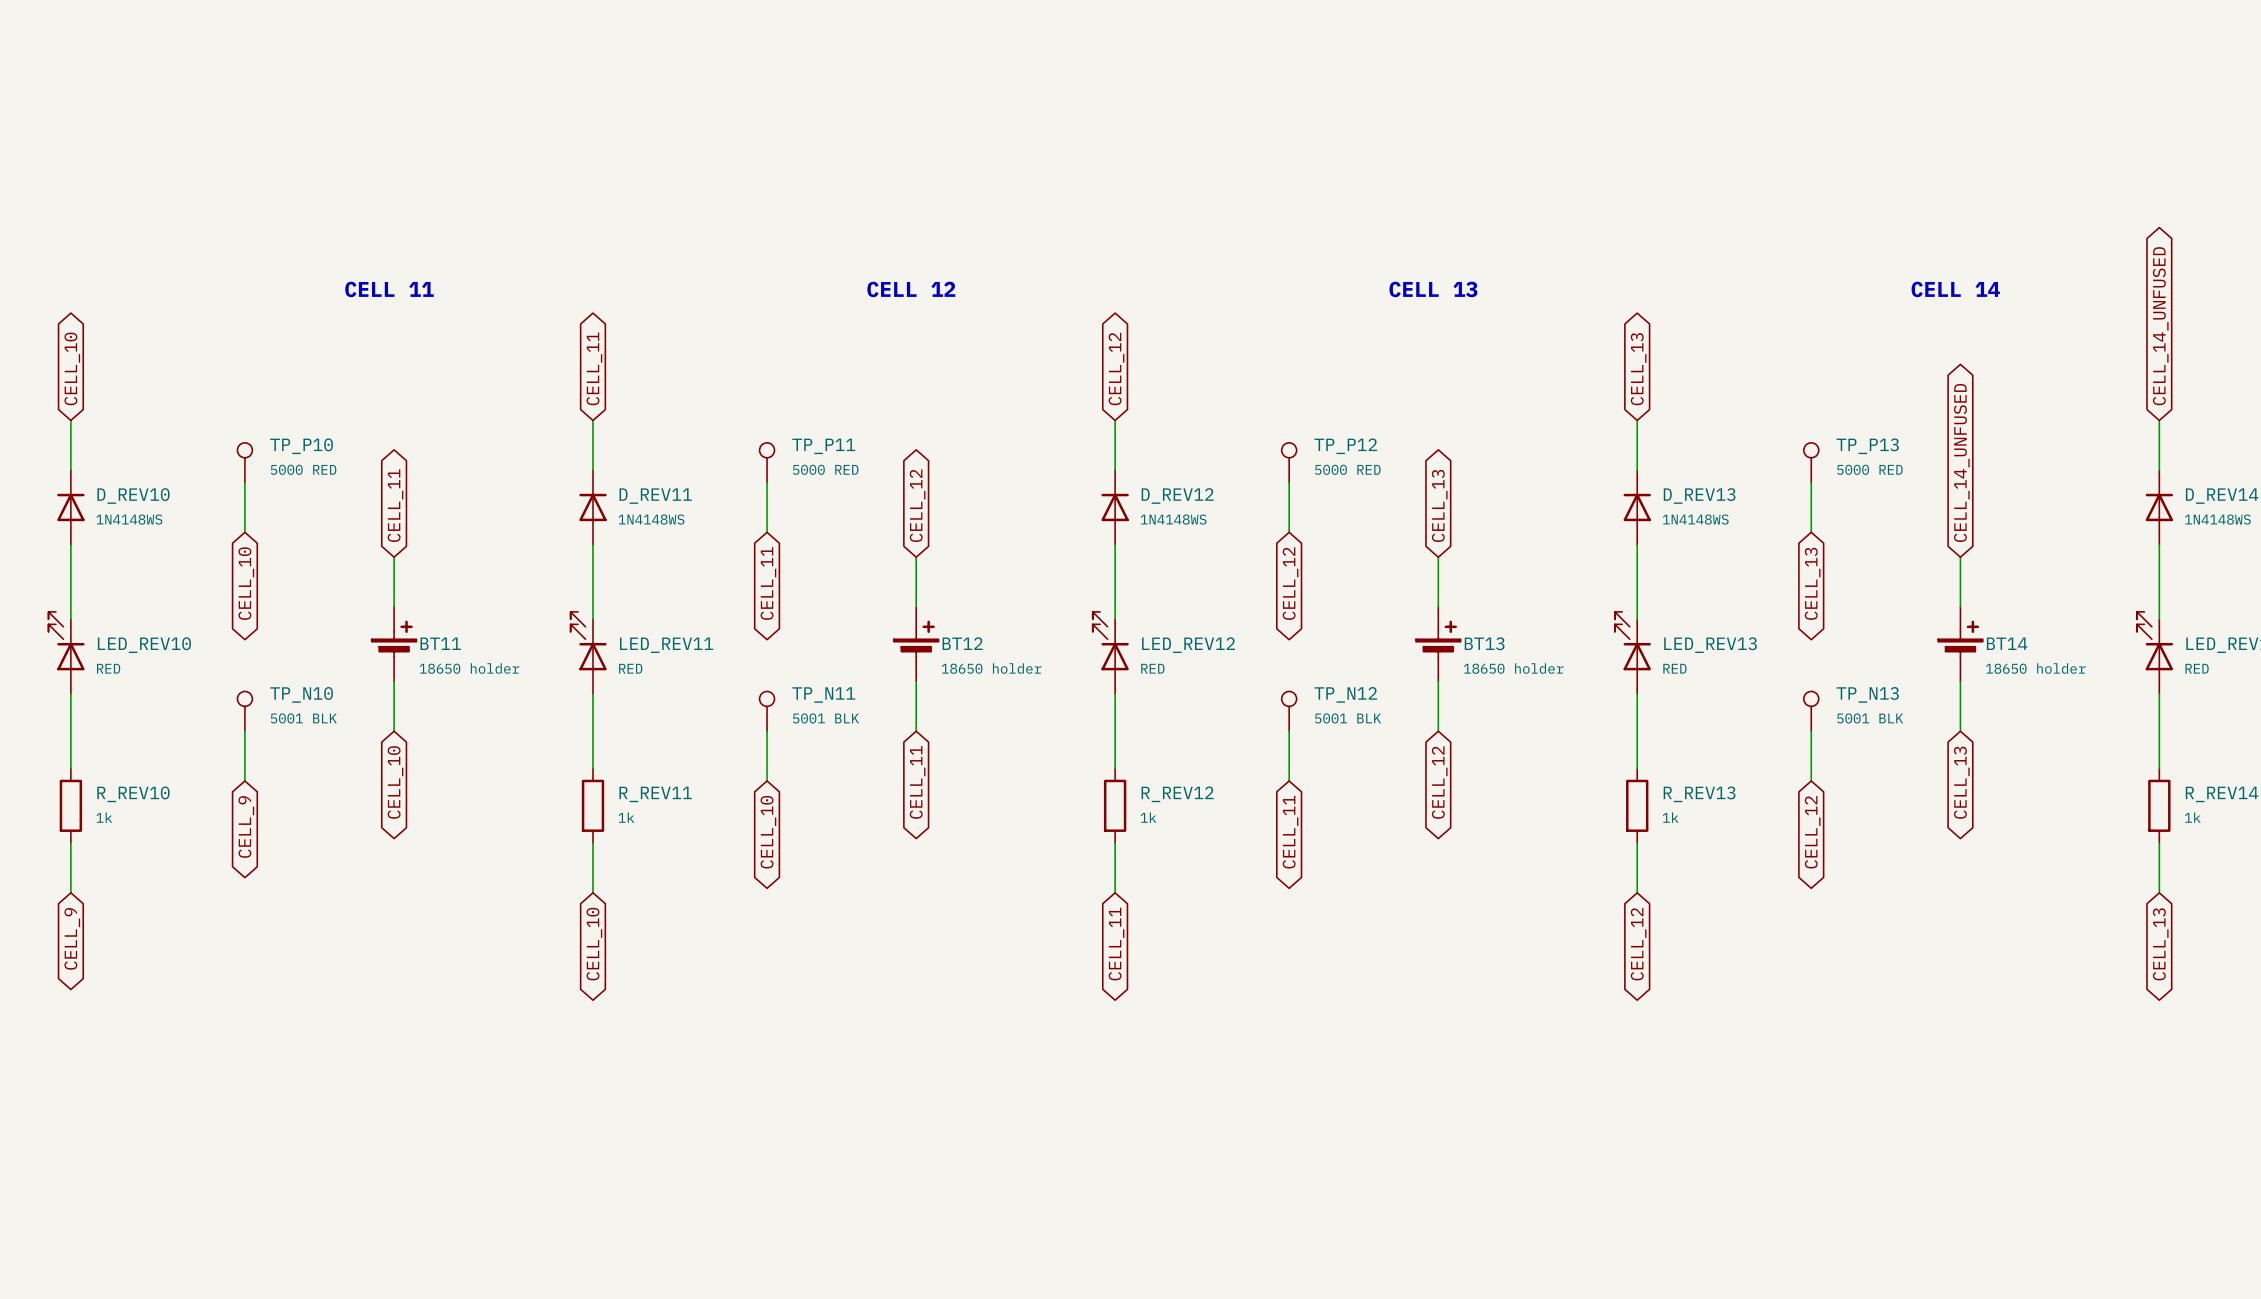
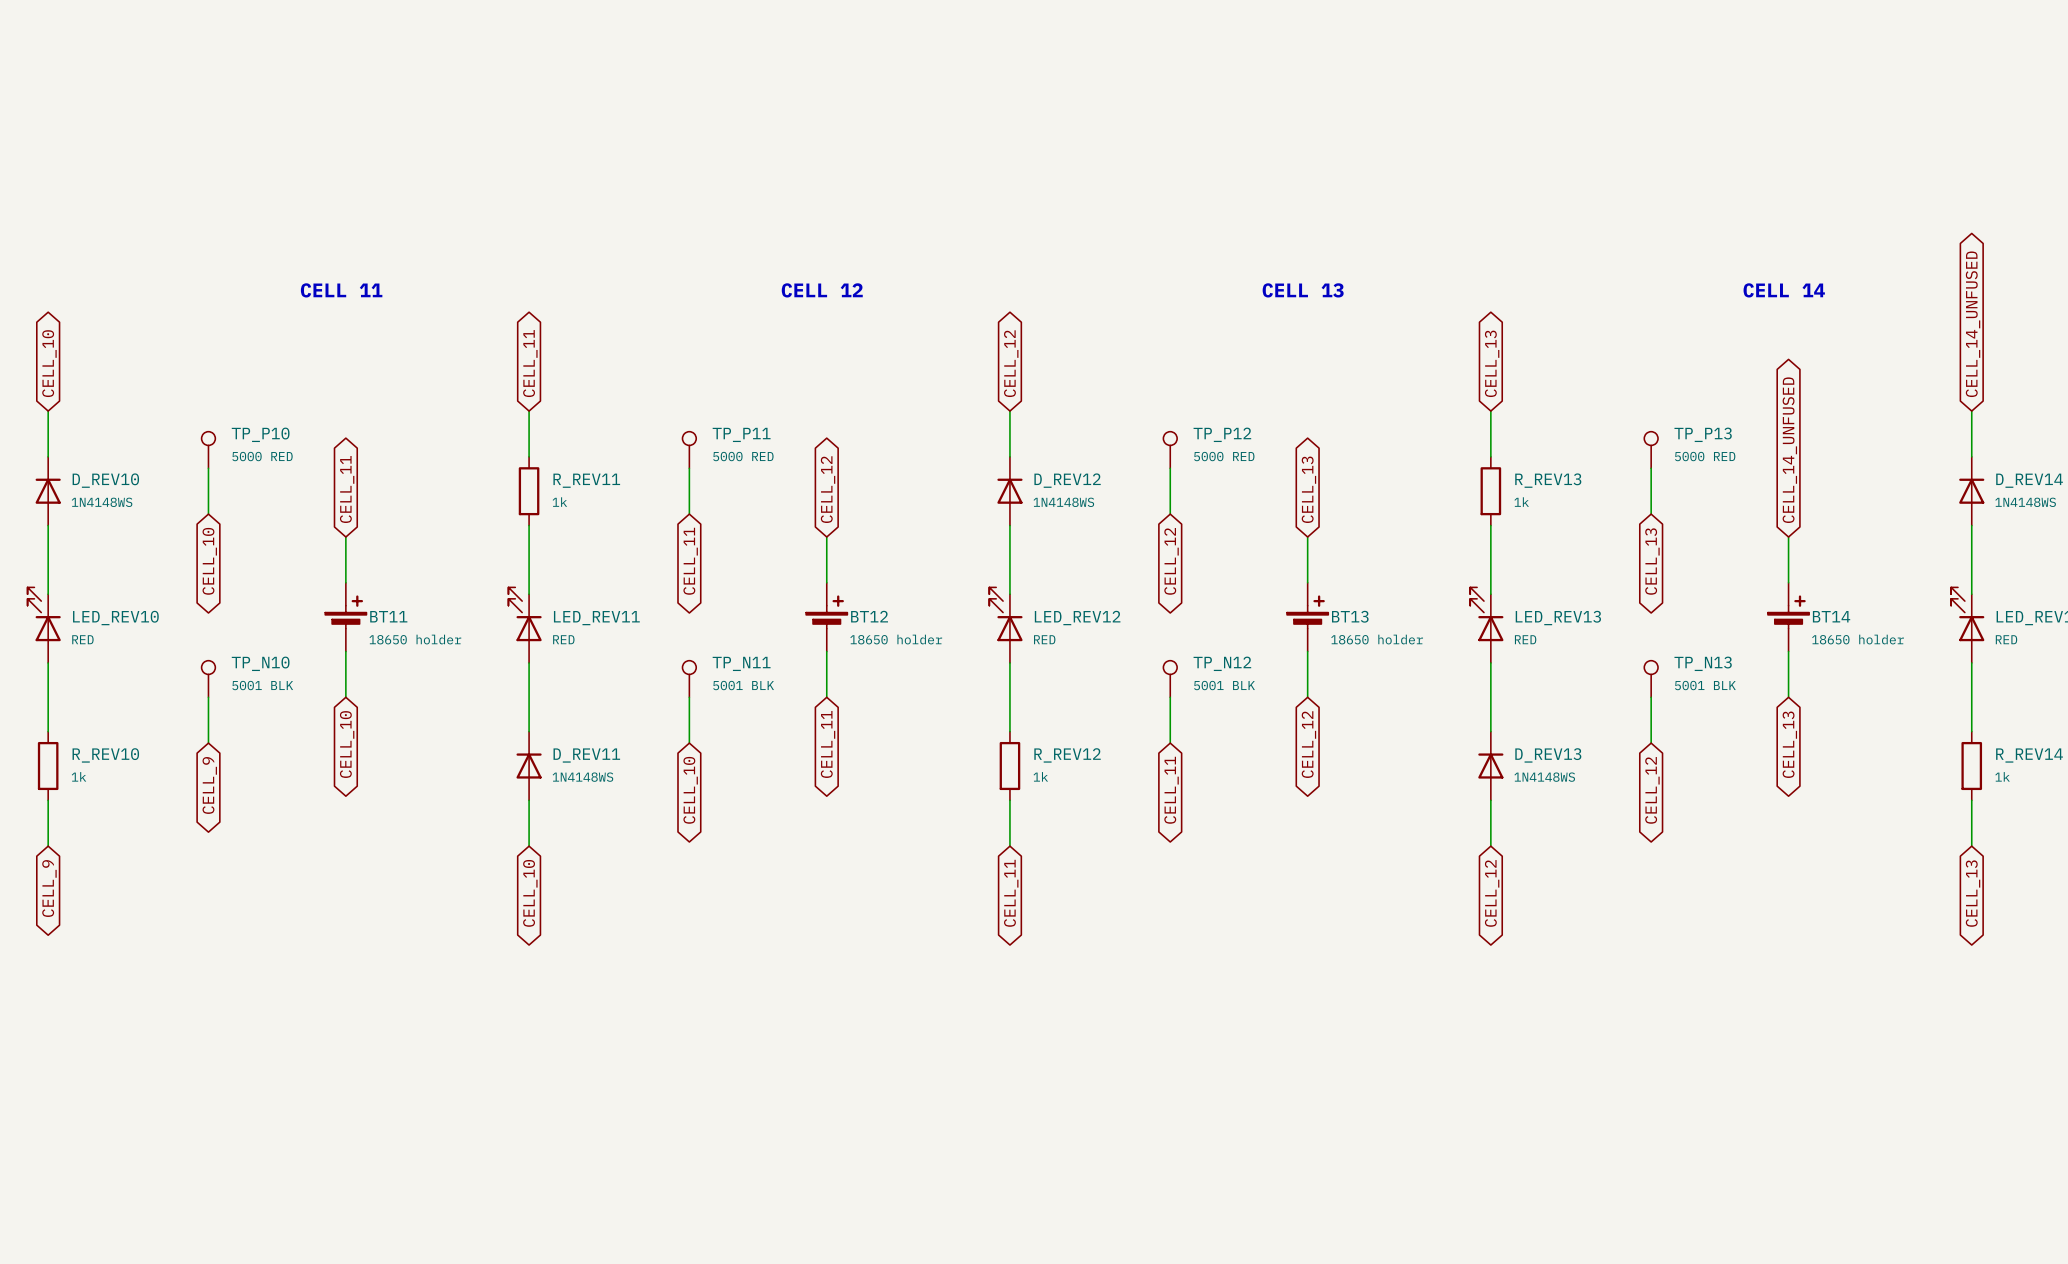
D_REV11 position: (593, 507) -> (529, 766)
D_REV13 position: (1637, 507) -> (1490, 766)
R_REV11 position: (593, 805) -> (529, 491)
R_REV13 position: (1637, 805) -> (1490, 491)

